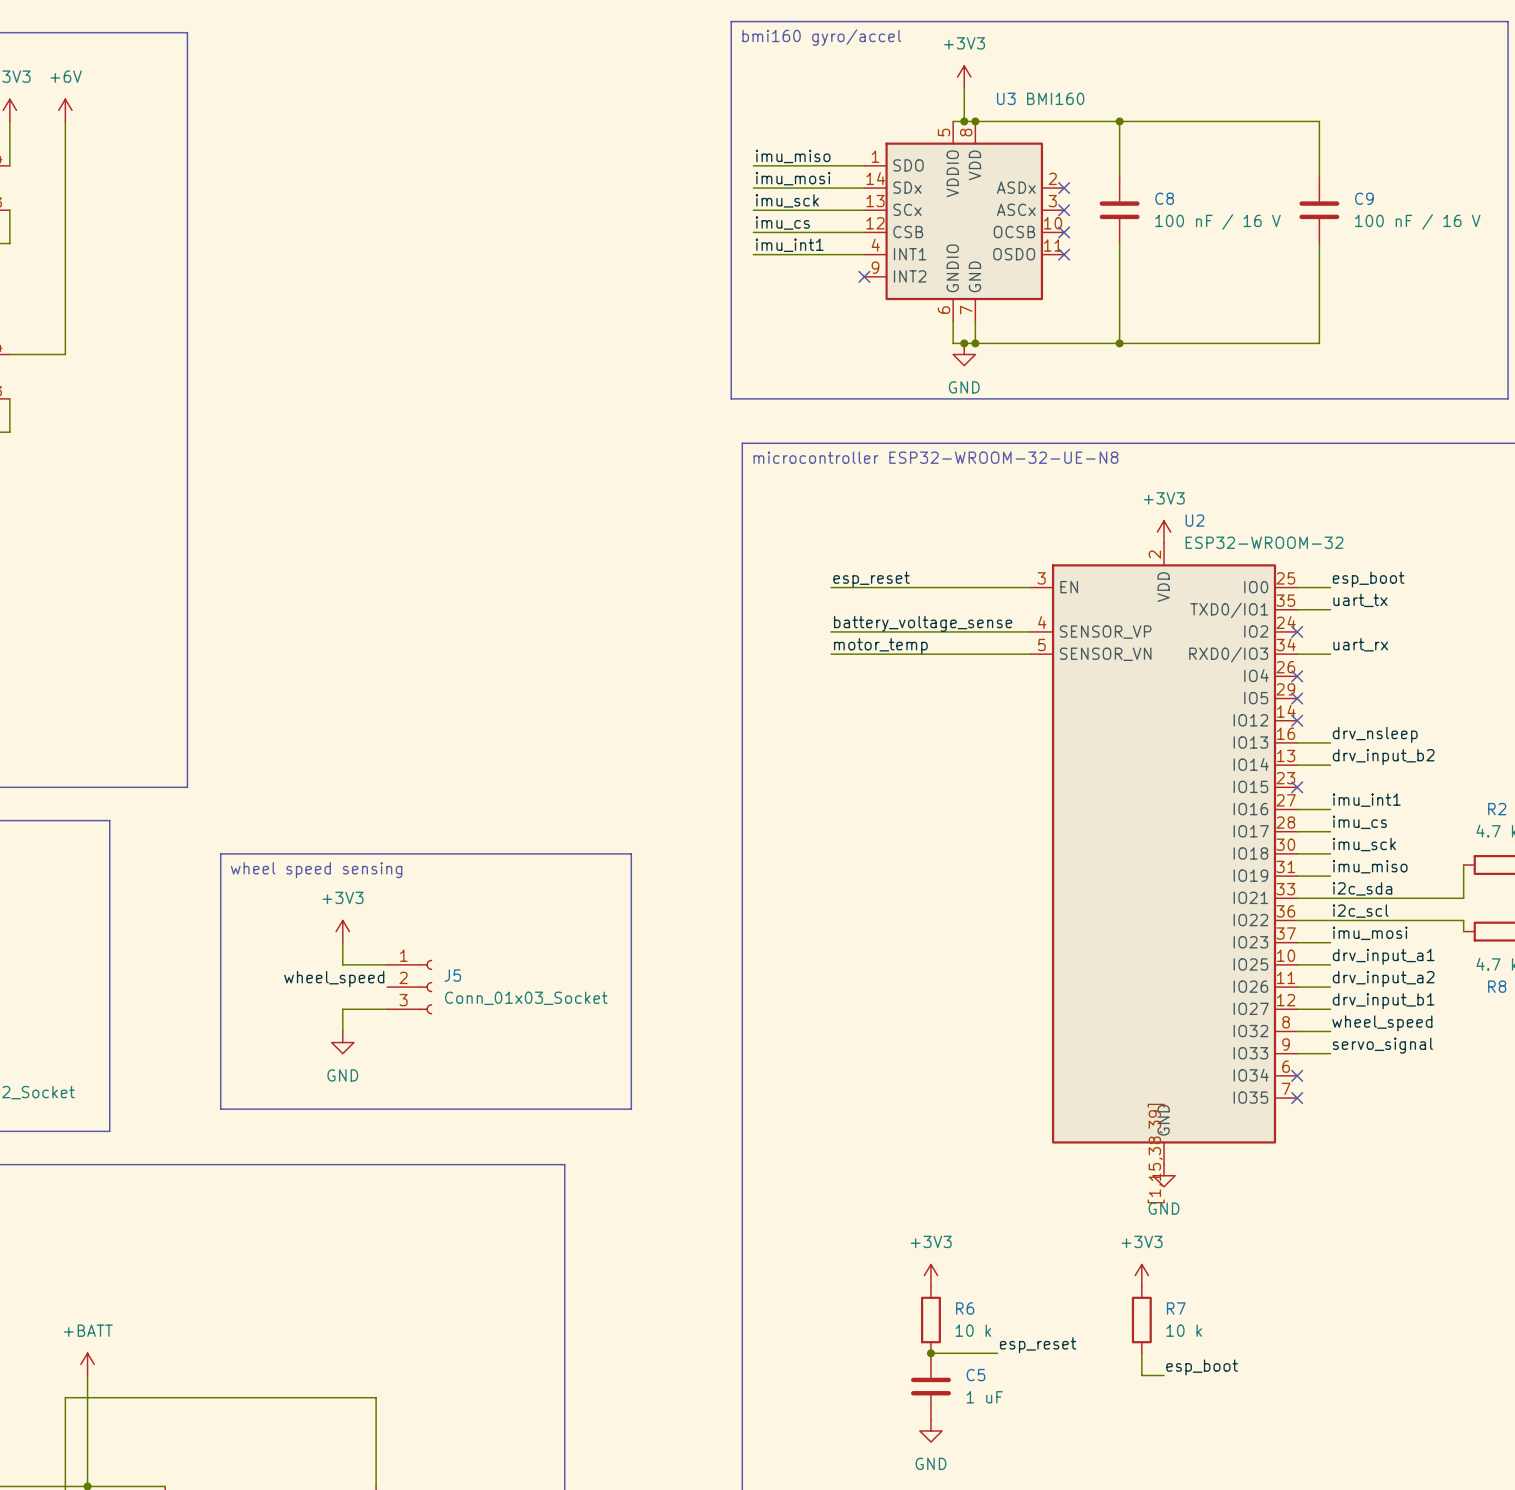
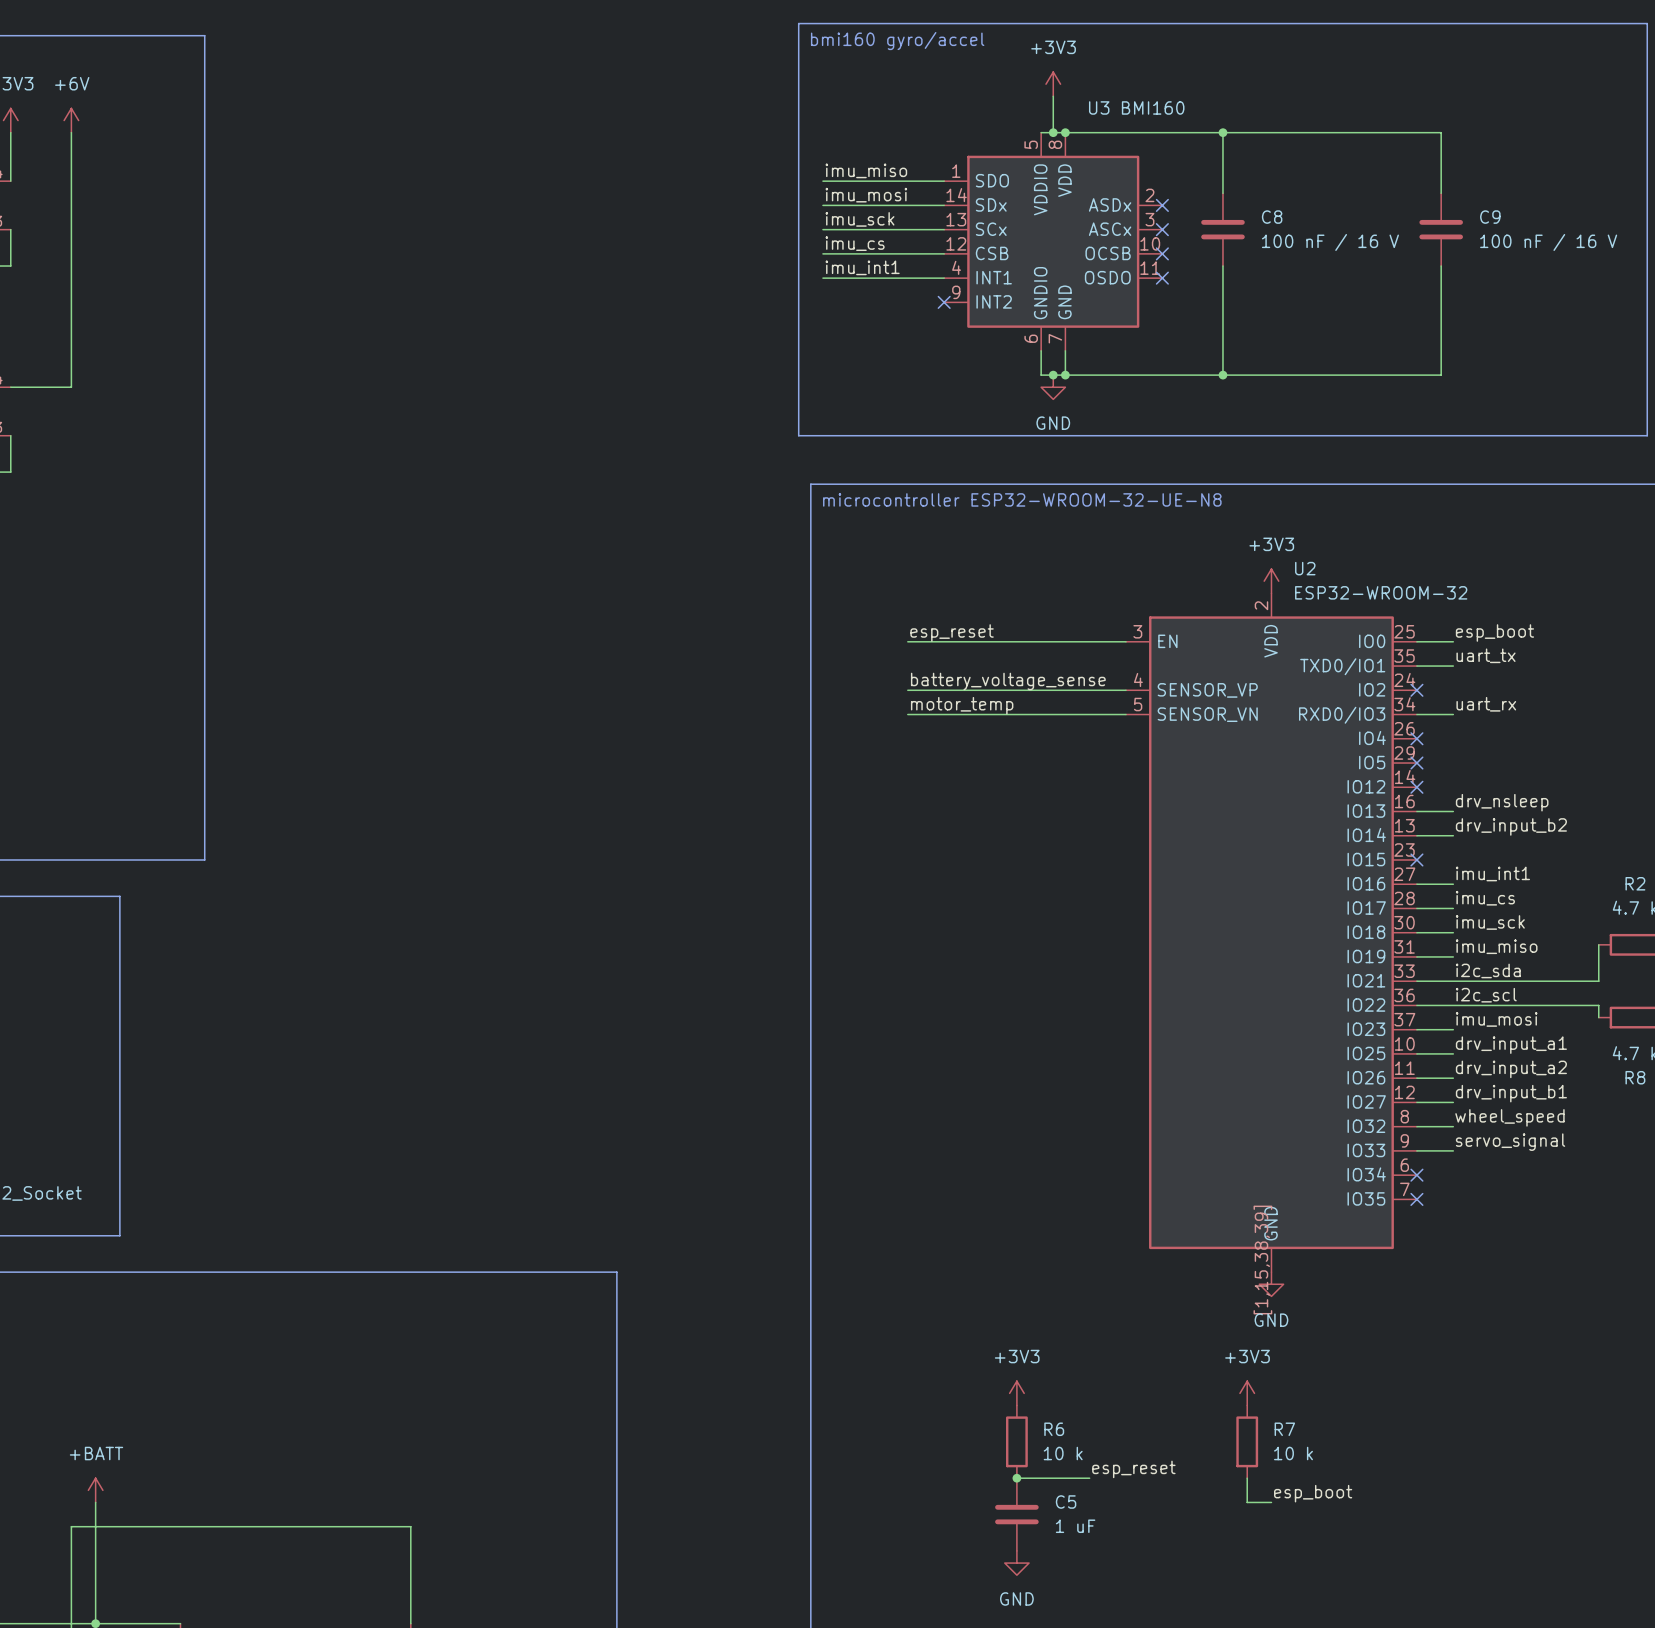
line: (220, 853) (631, 853) (631, 1109) (220, 1109) (220, 853) -> none
text: wheel speed sensing (316, 870) -> none
power symbol: +3V3 (342, 931) -> none
wire: (342, 942) (342, 964) (387, 964) -> none
label: wheel_speed (334, 979) -> none
J5: Conn_01x03_Socket (409, 987) -> none
wire: (387, 1009) (342, 1009) (342, 1031) -> none
power symbol: GND (342, 1042) -> none

